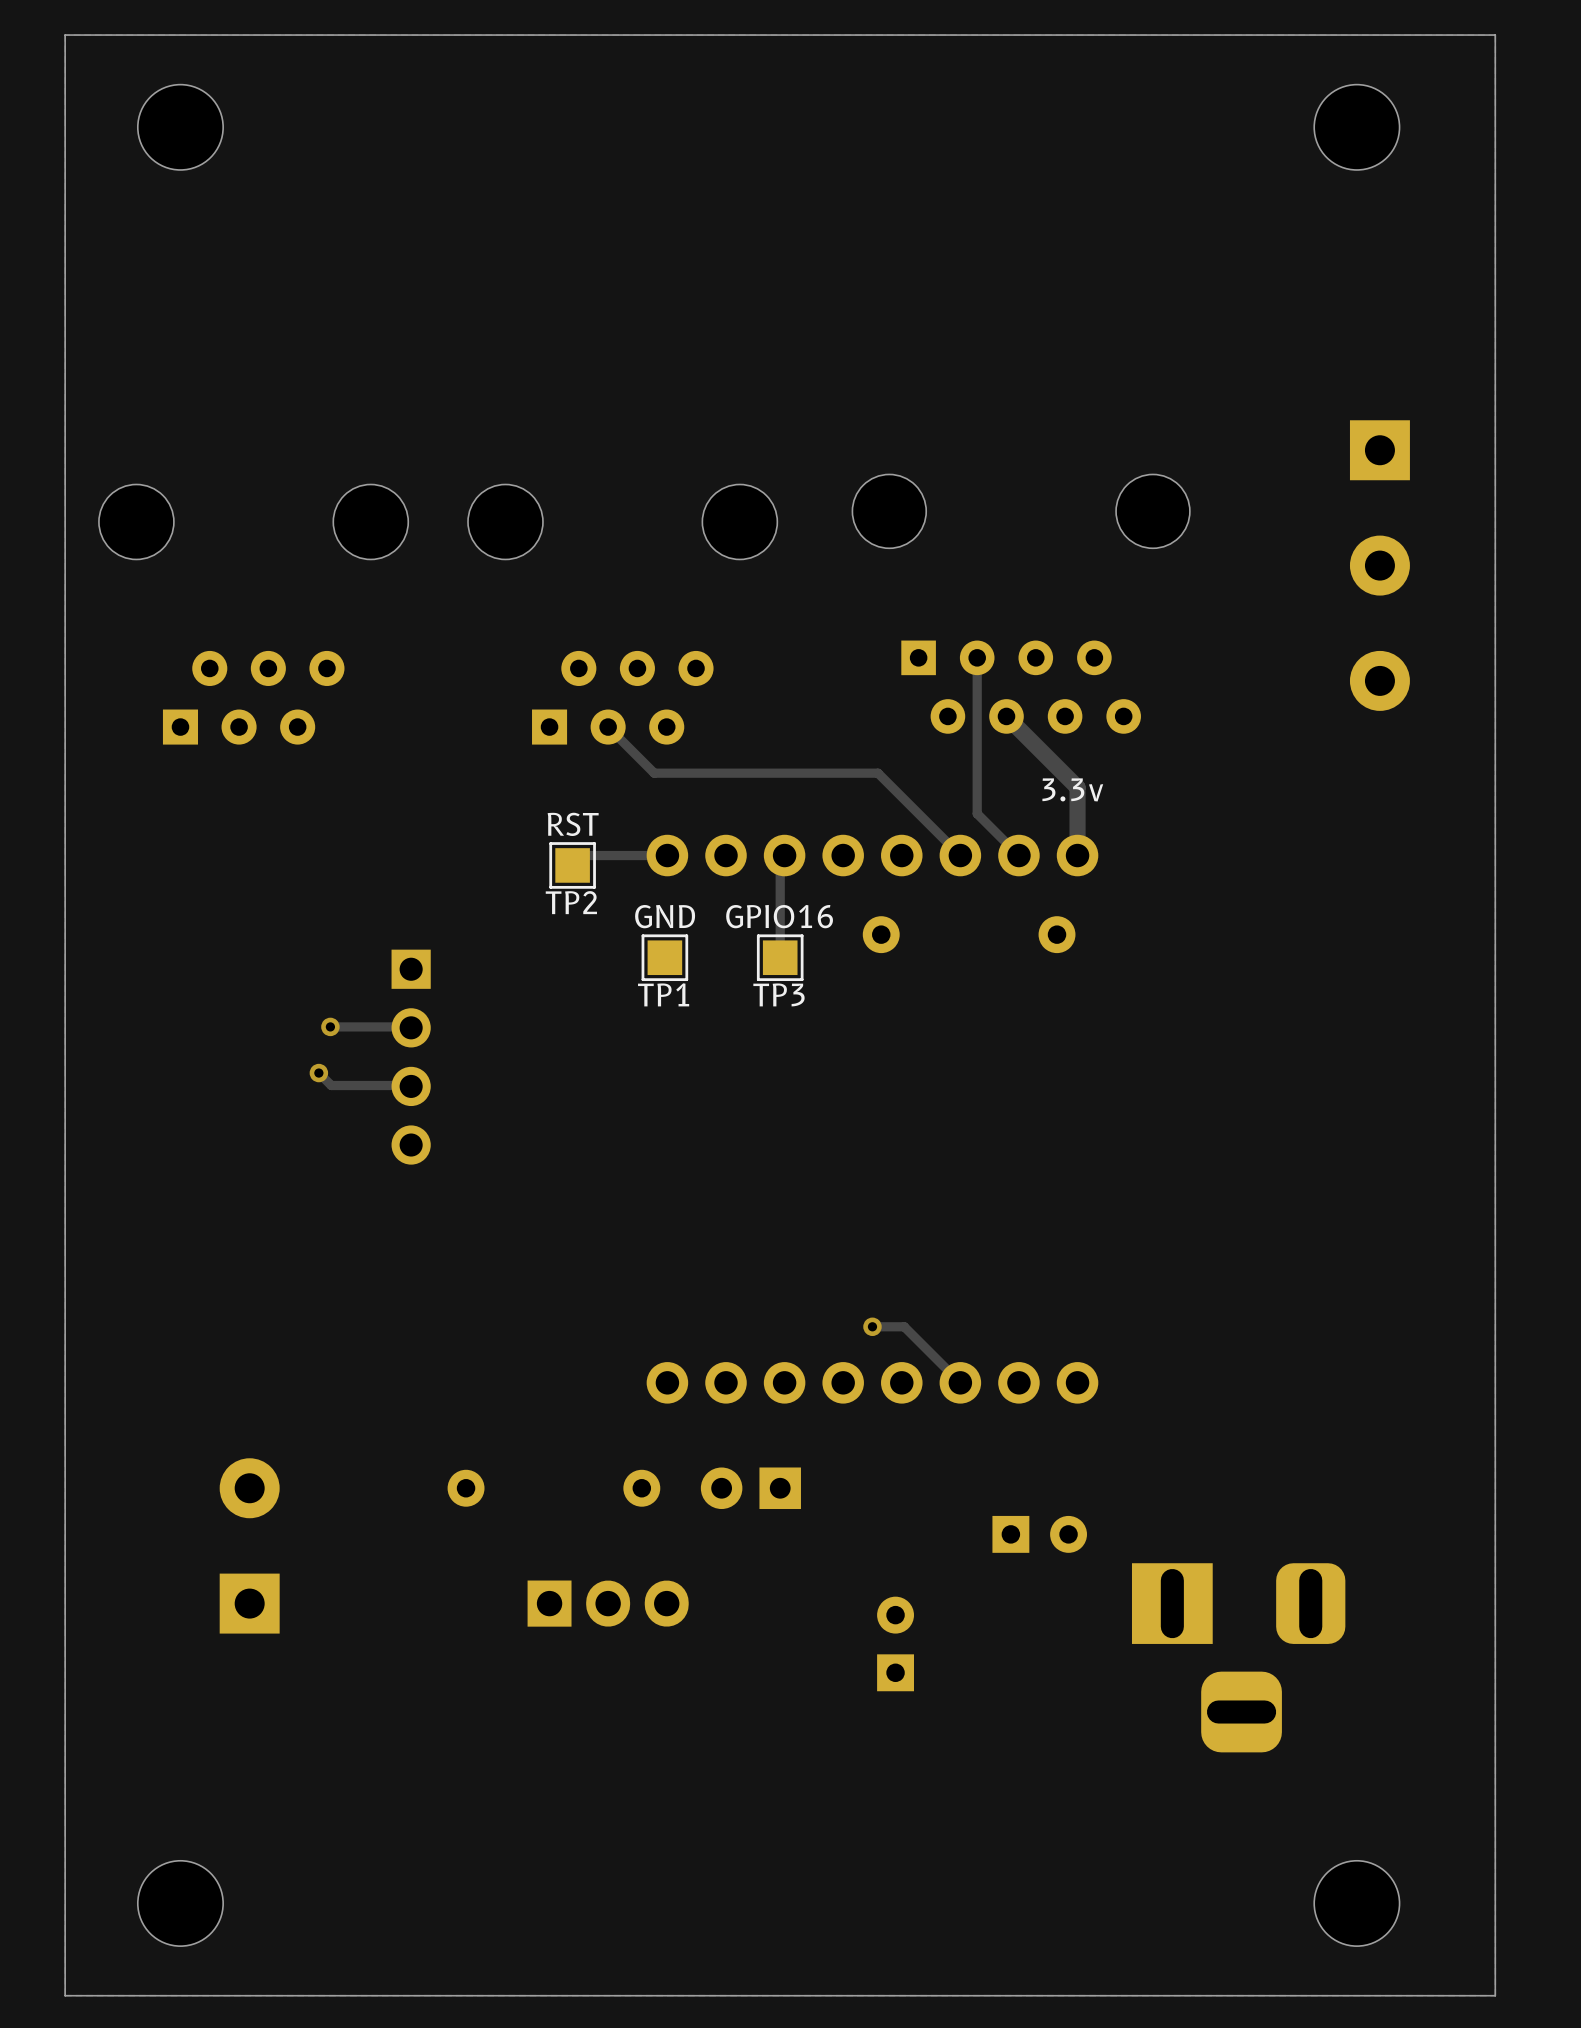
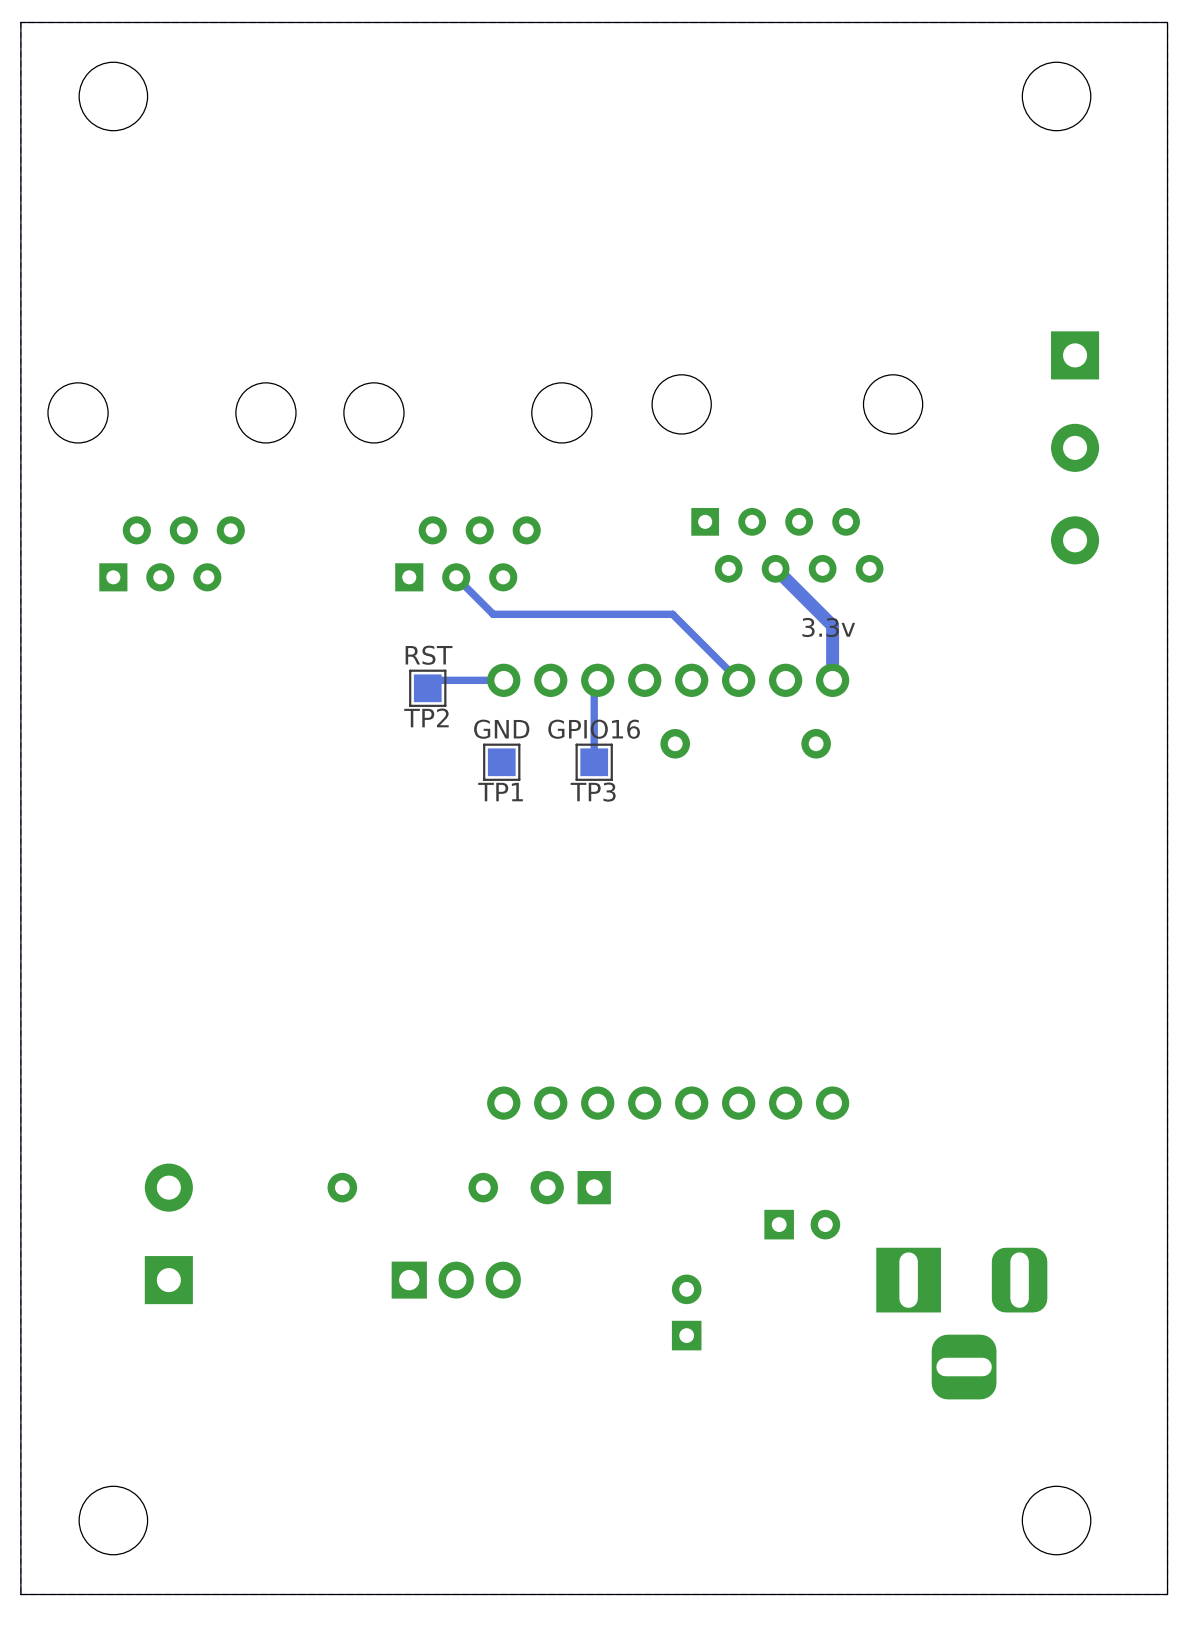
track: (977, 657) (977, 813) (1018, 855) -> none
track: (330, 1026) (411, 1027) -> none
via: (330, 1026) -> none
part: (411, 1057) -> none
track: (318, 1073) (331, 1085) (411, 1085) -> none
via: (318, 1073) -> none
track: (872, 1326) (904, 1326) (960, 1382) -> none
via: (872, 1326) -> none

